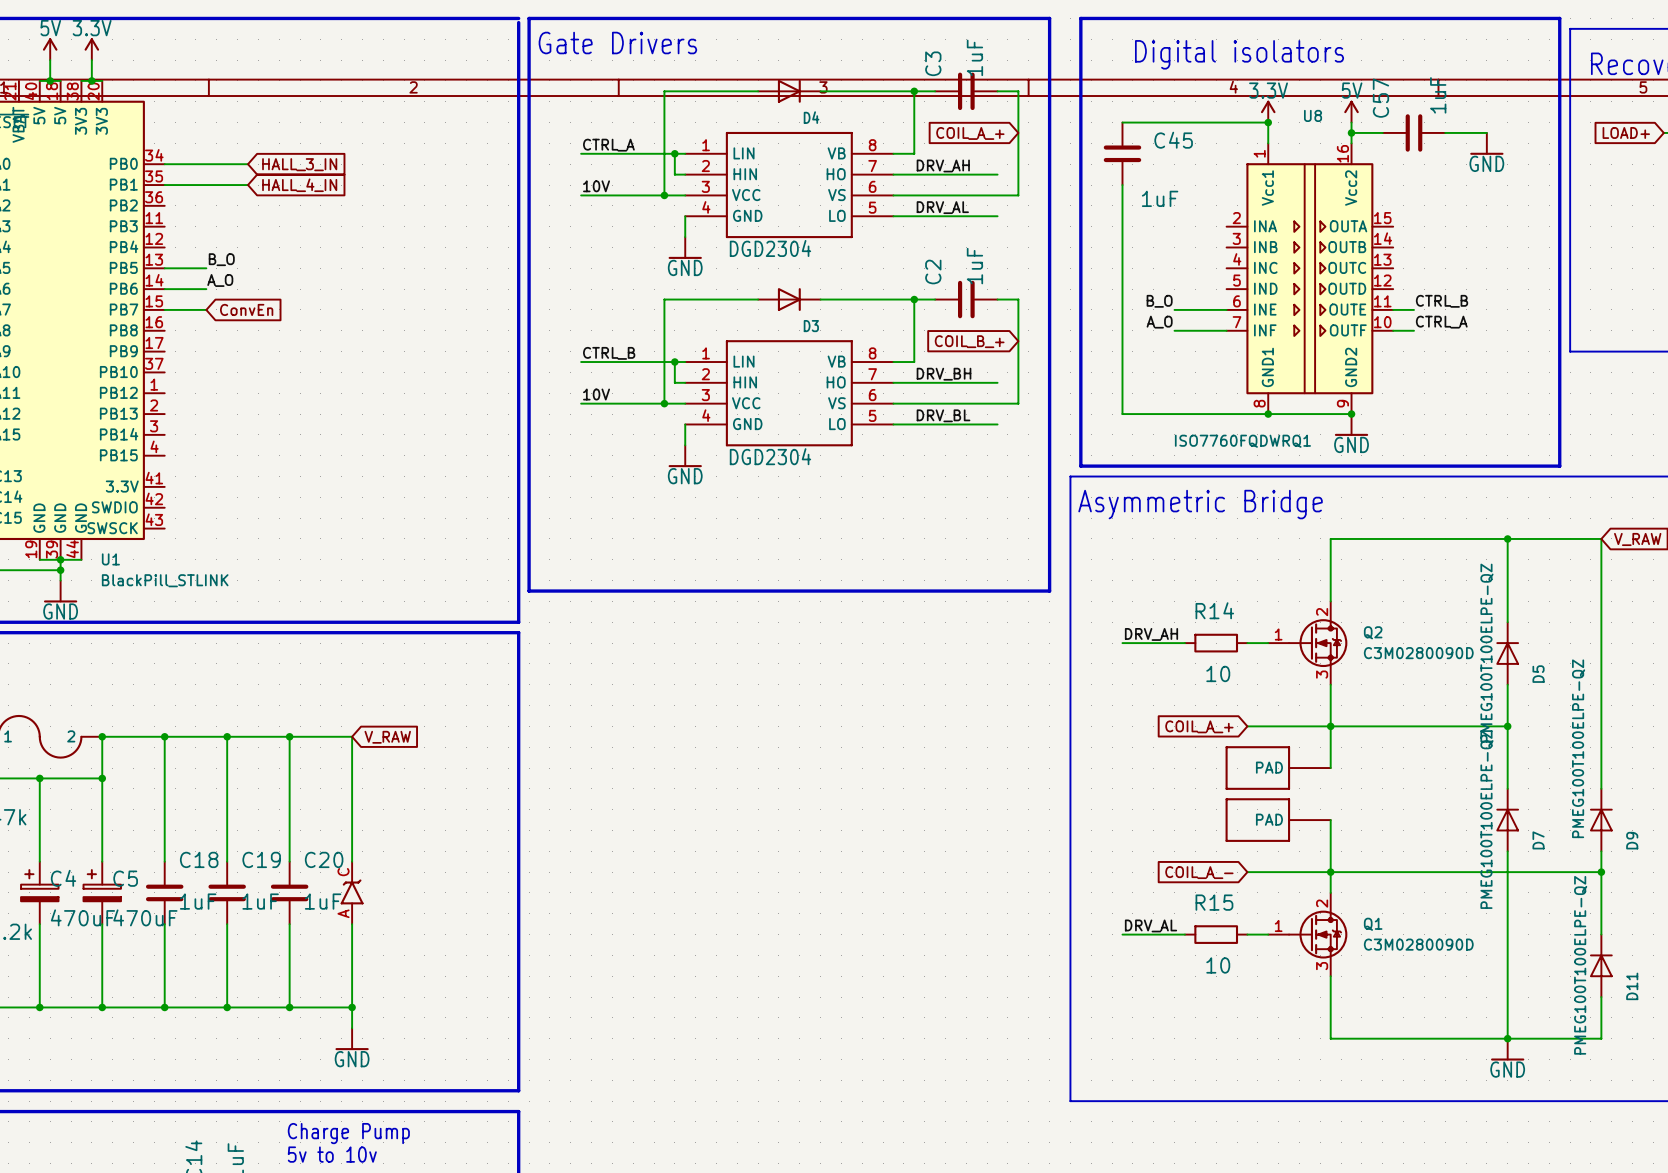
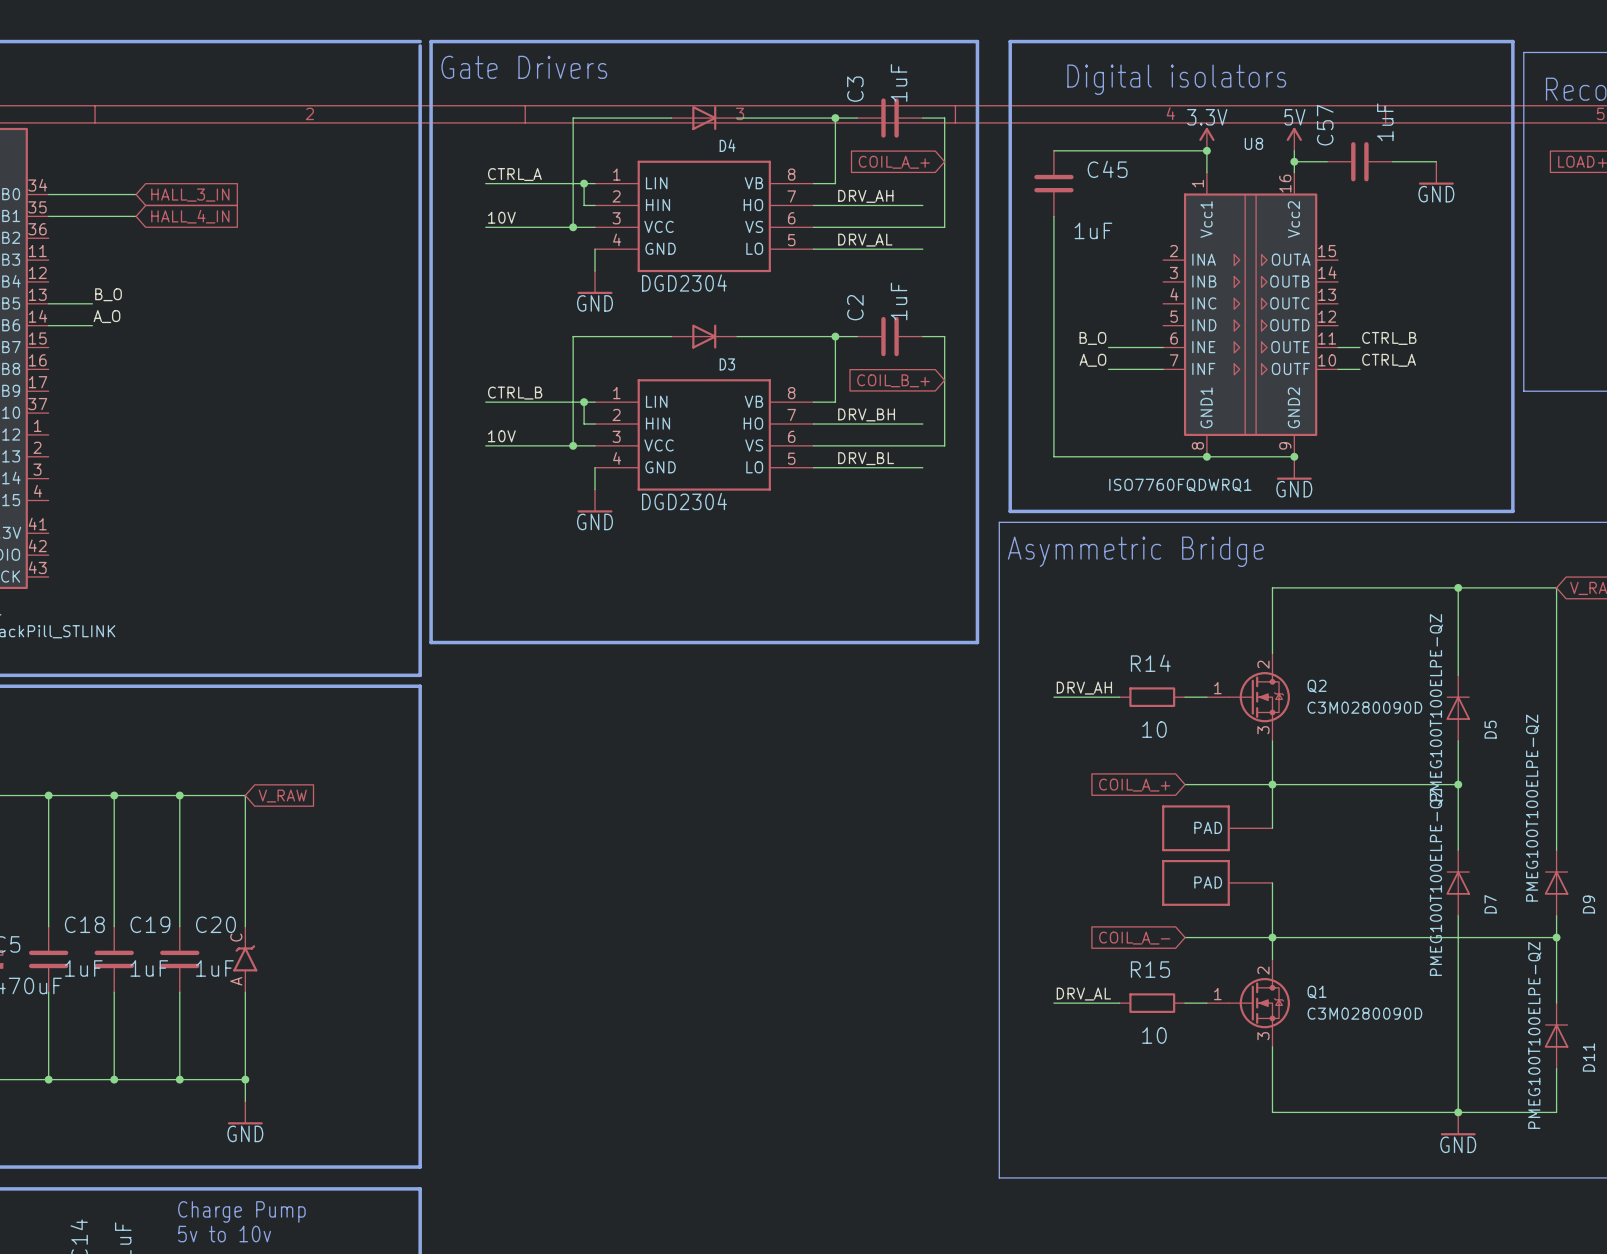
wire: (164, 309) (206, 309) -> none
global label: ConvEn (246, 309) -> none

